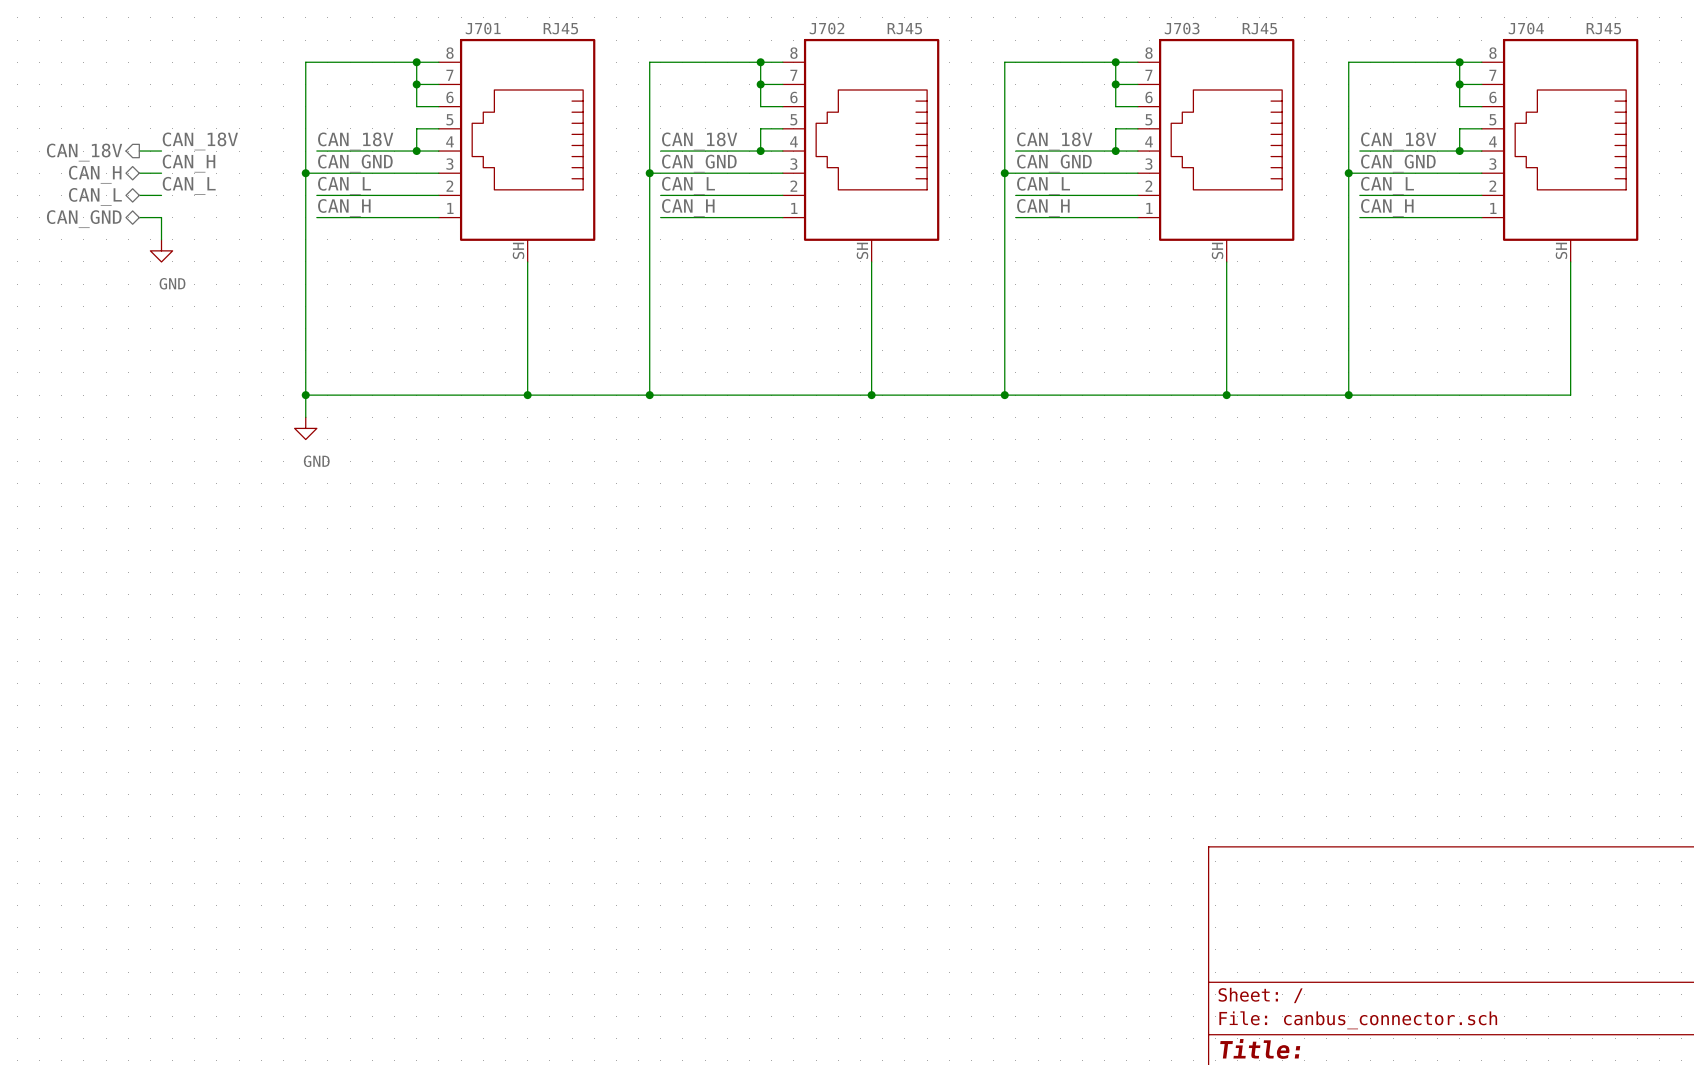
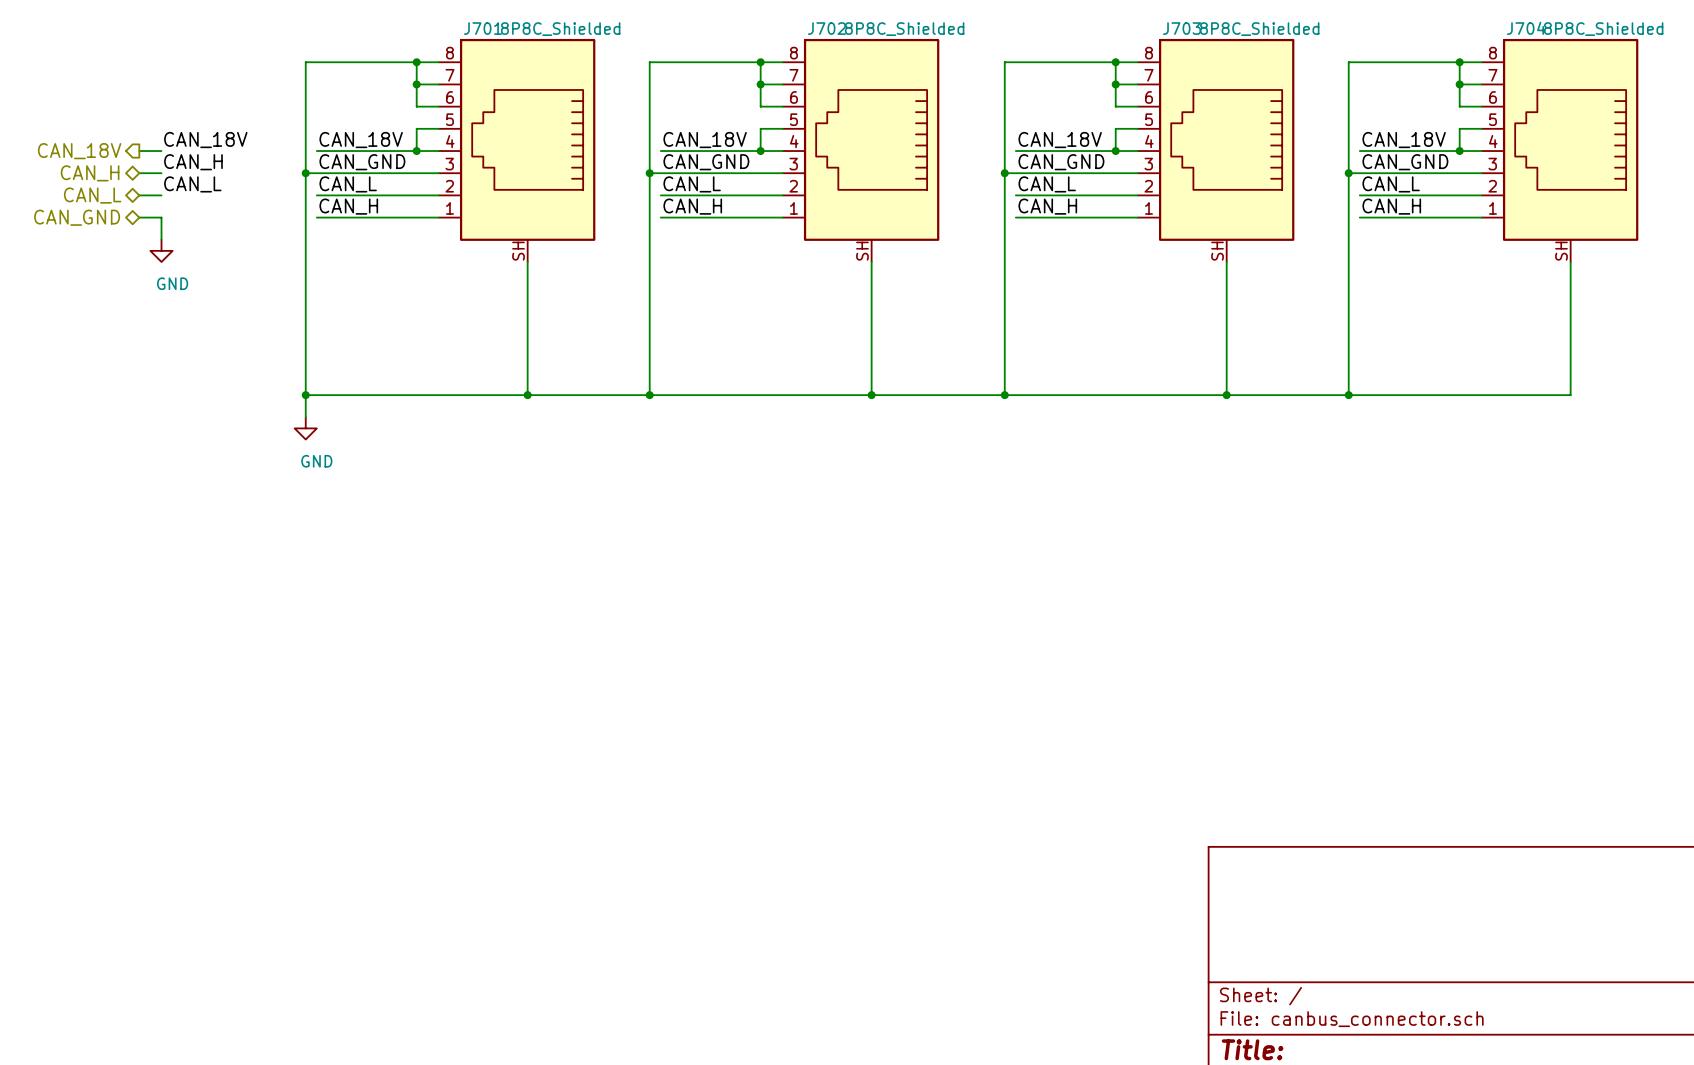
J701 value: RJ45 (560, 28) -> 8P8C_Shielded (560, 29)
J702 value: RJ45 (904, 28) -> 8P8C_Shielded (904, 29)
J703 value: RJ45 (1259, 28) -> 8P8C_Shielded (1259, 29)
J704 value: RJ45 (1603, 28) -> 8P8C_Shielded (1603, 29)

